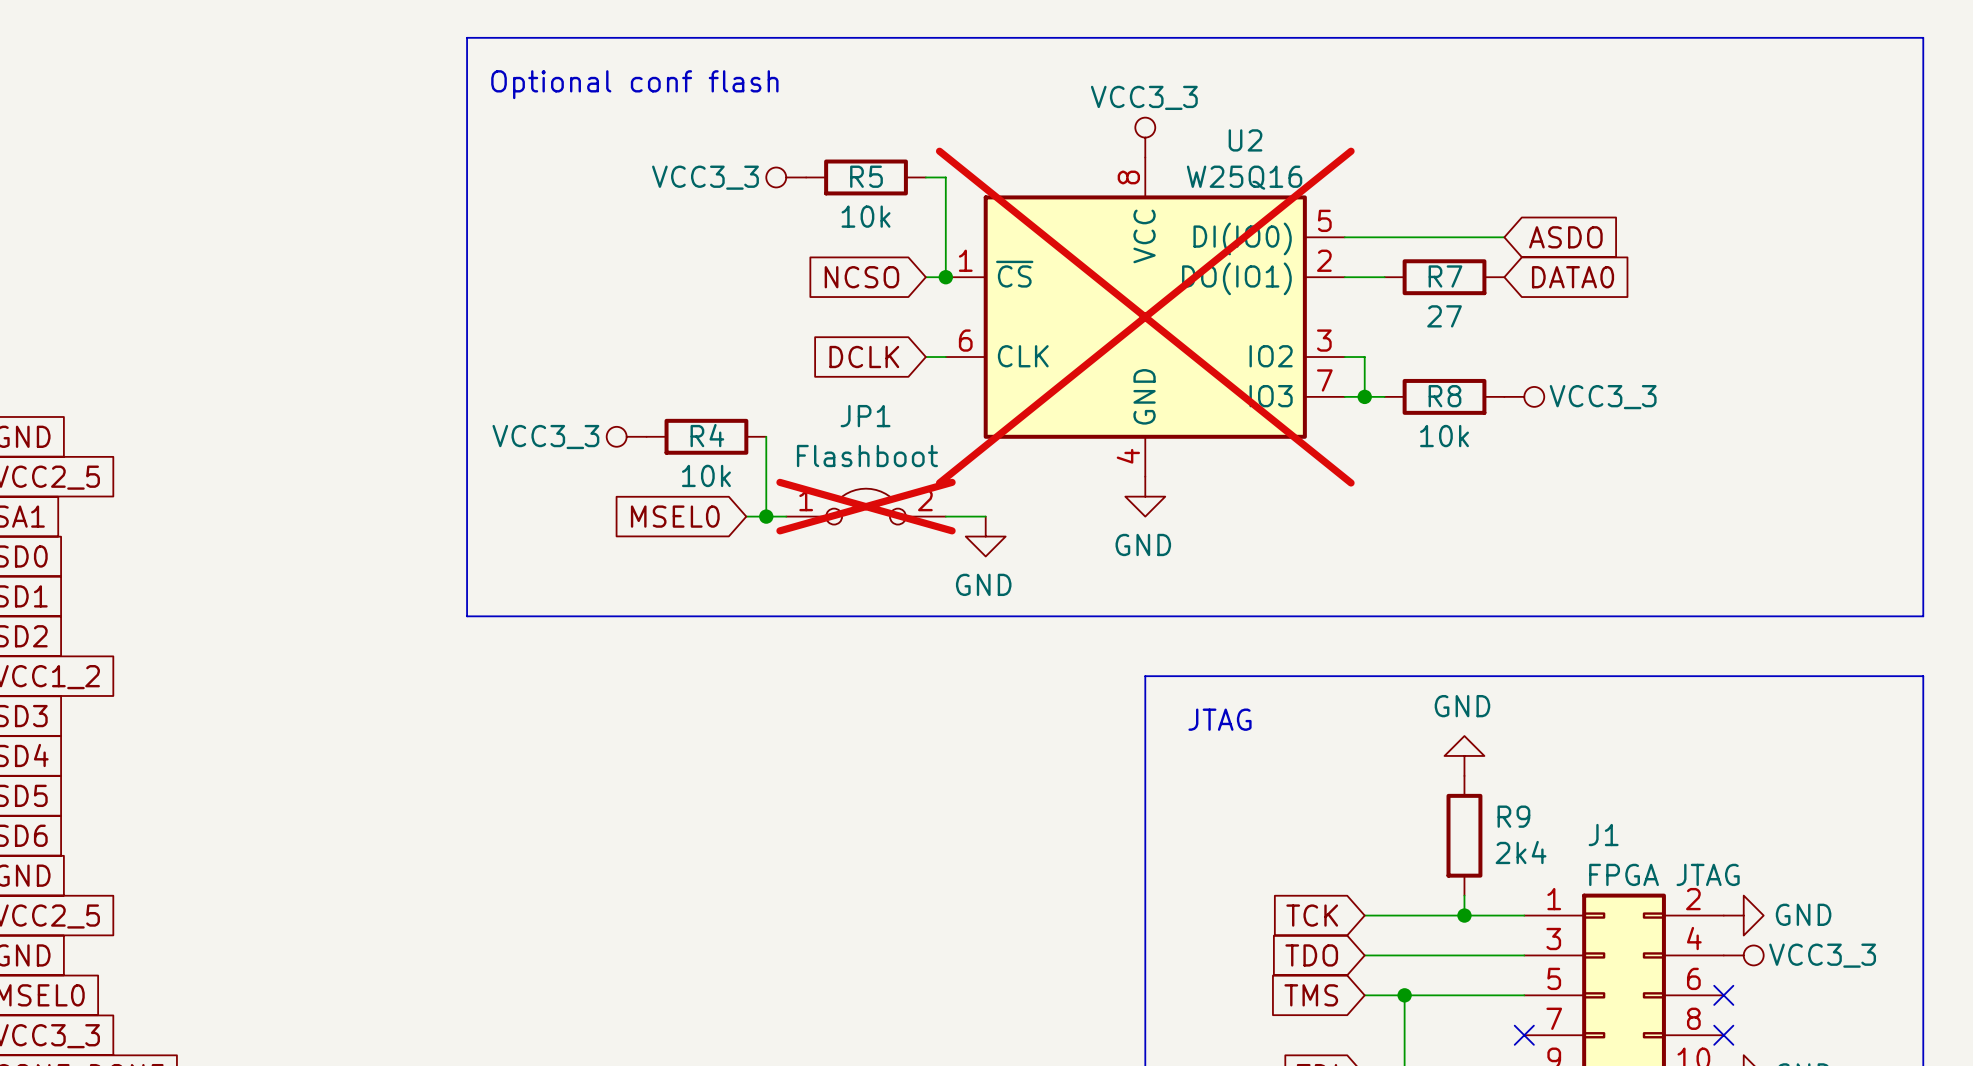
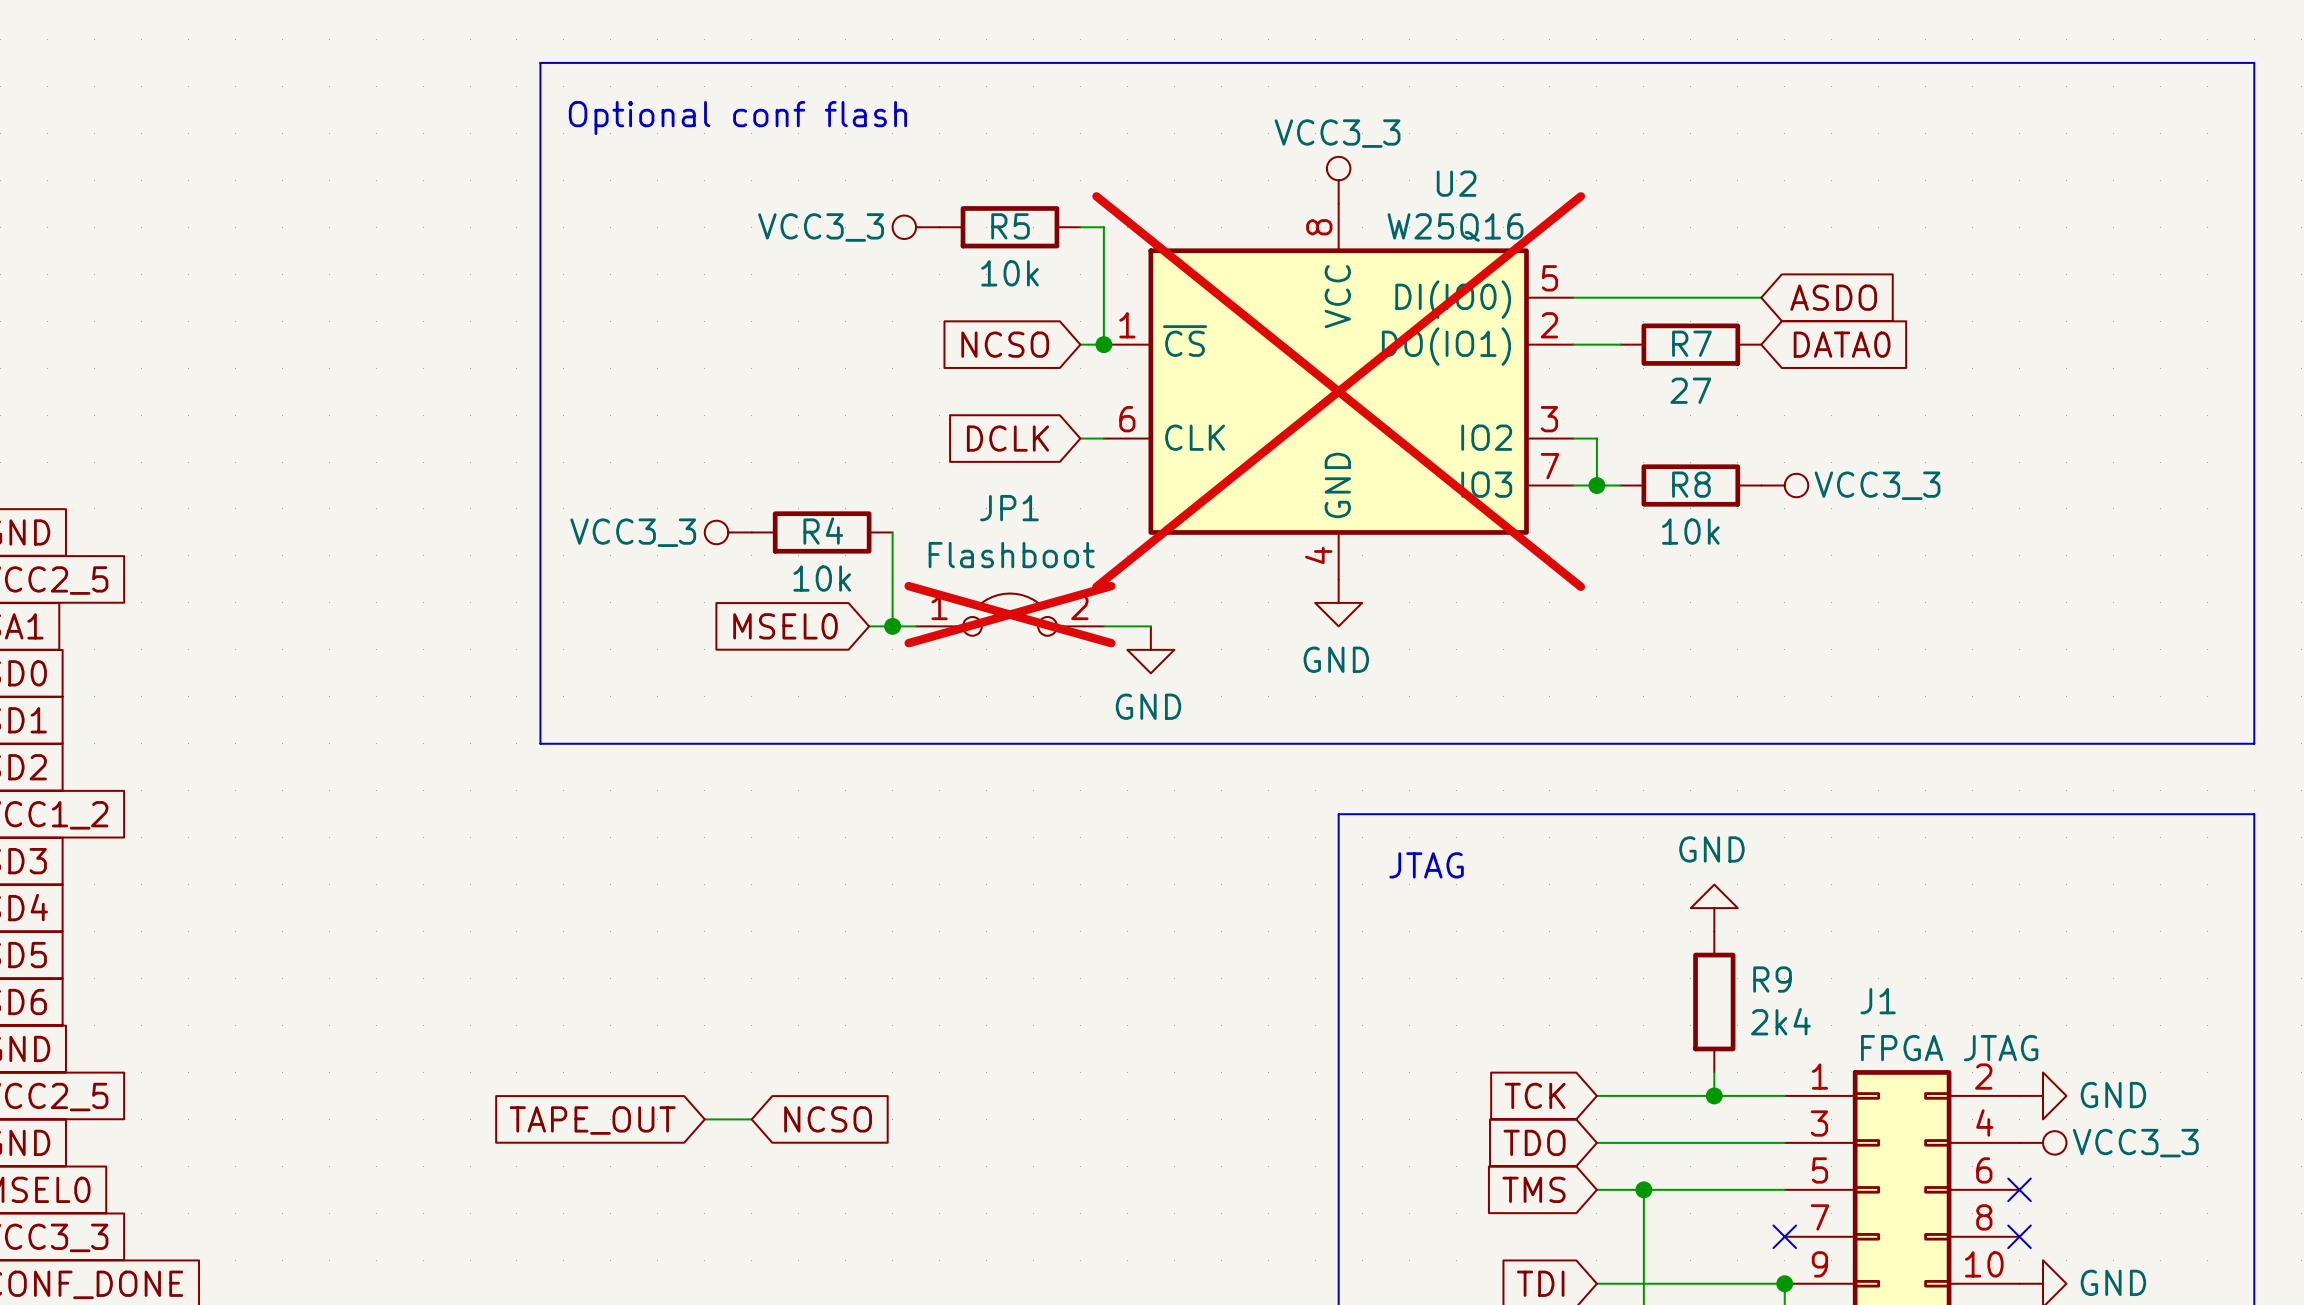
wire: none -> (704, 1119) (751, 1119)
global label: none -> NCSO (828, 1119)
global label: none -> TAPE_OUT (592, 1120)

